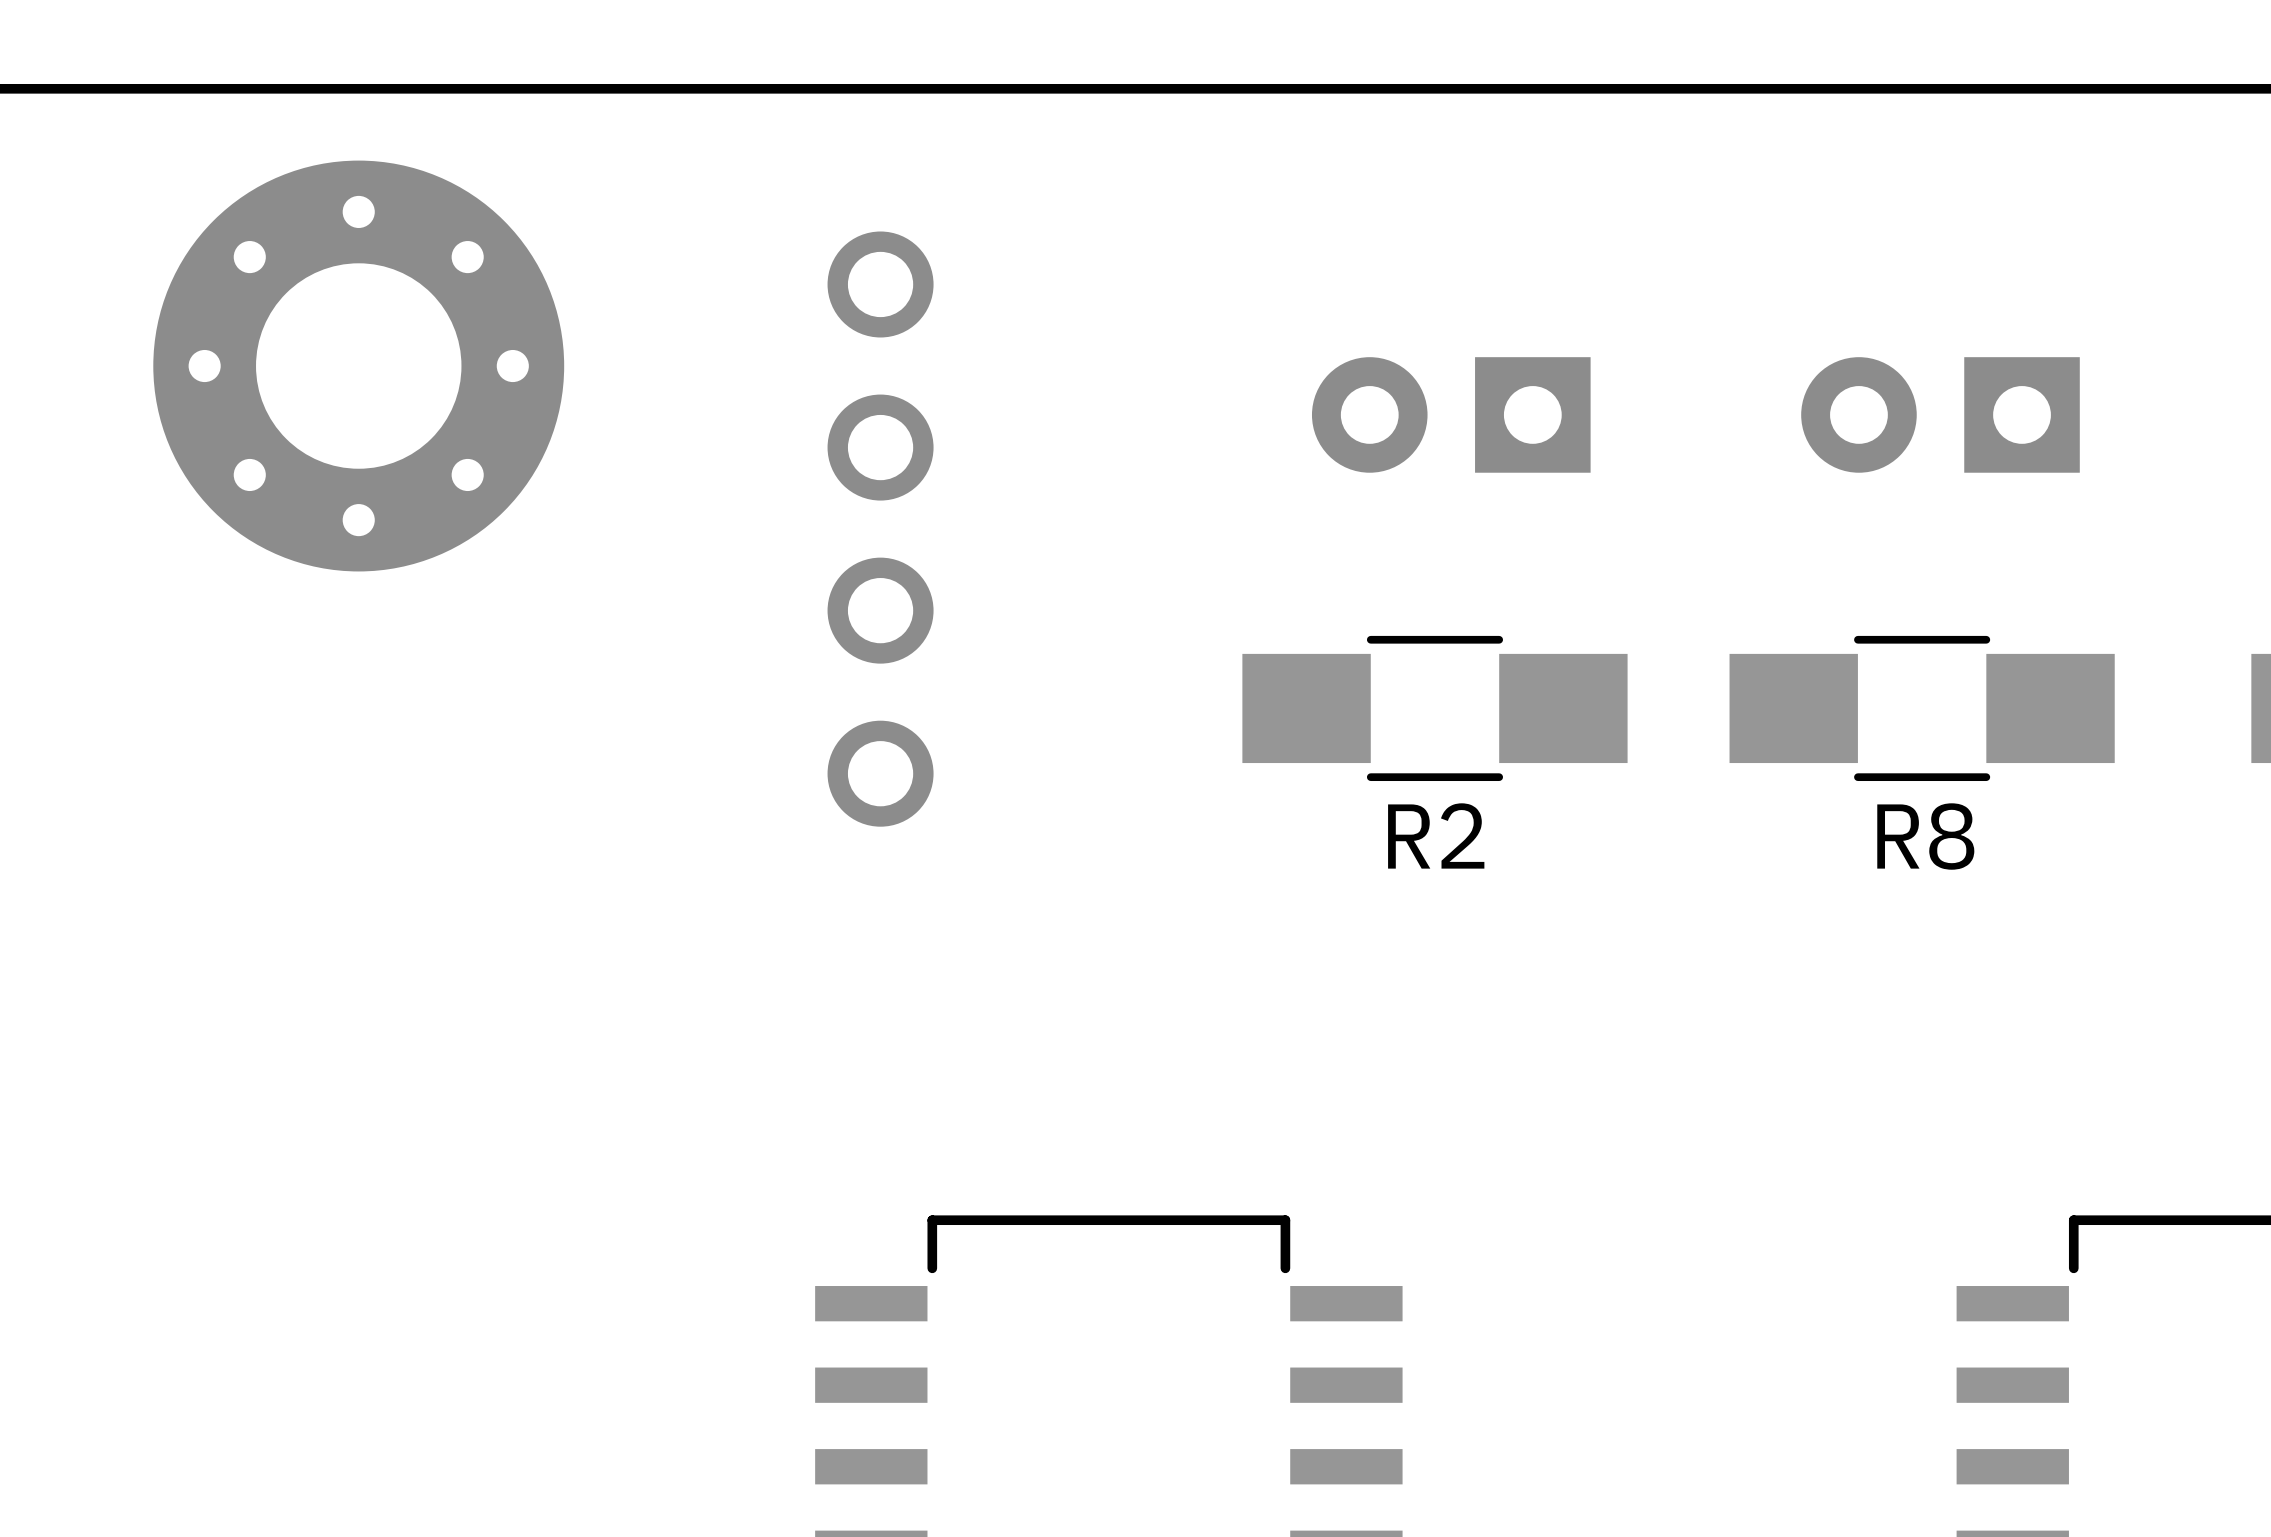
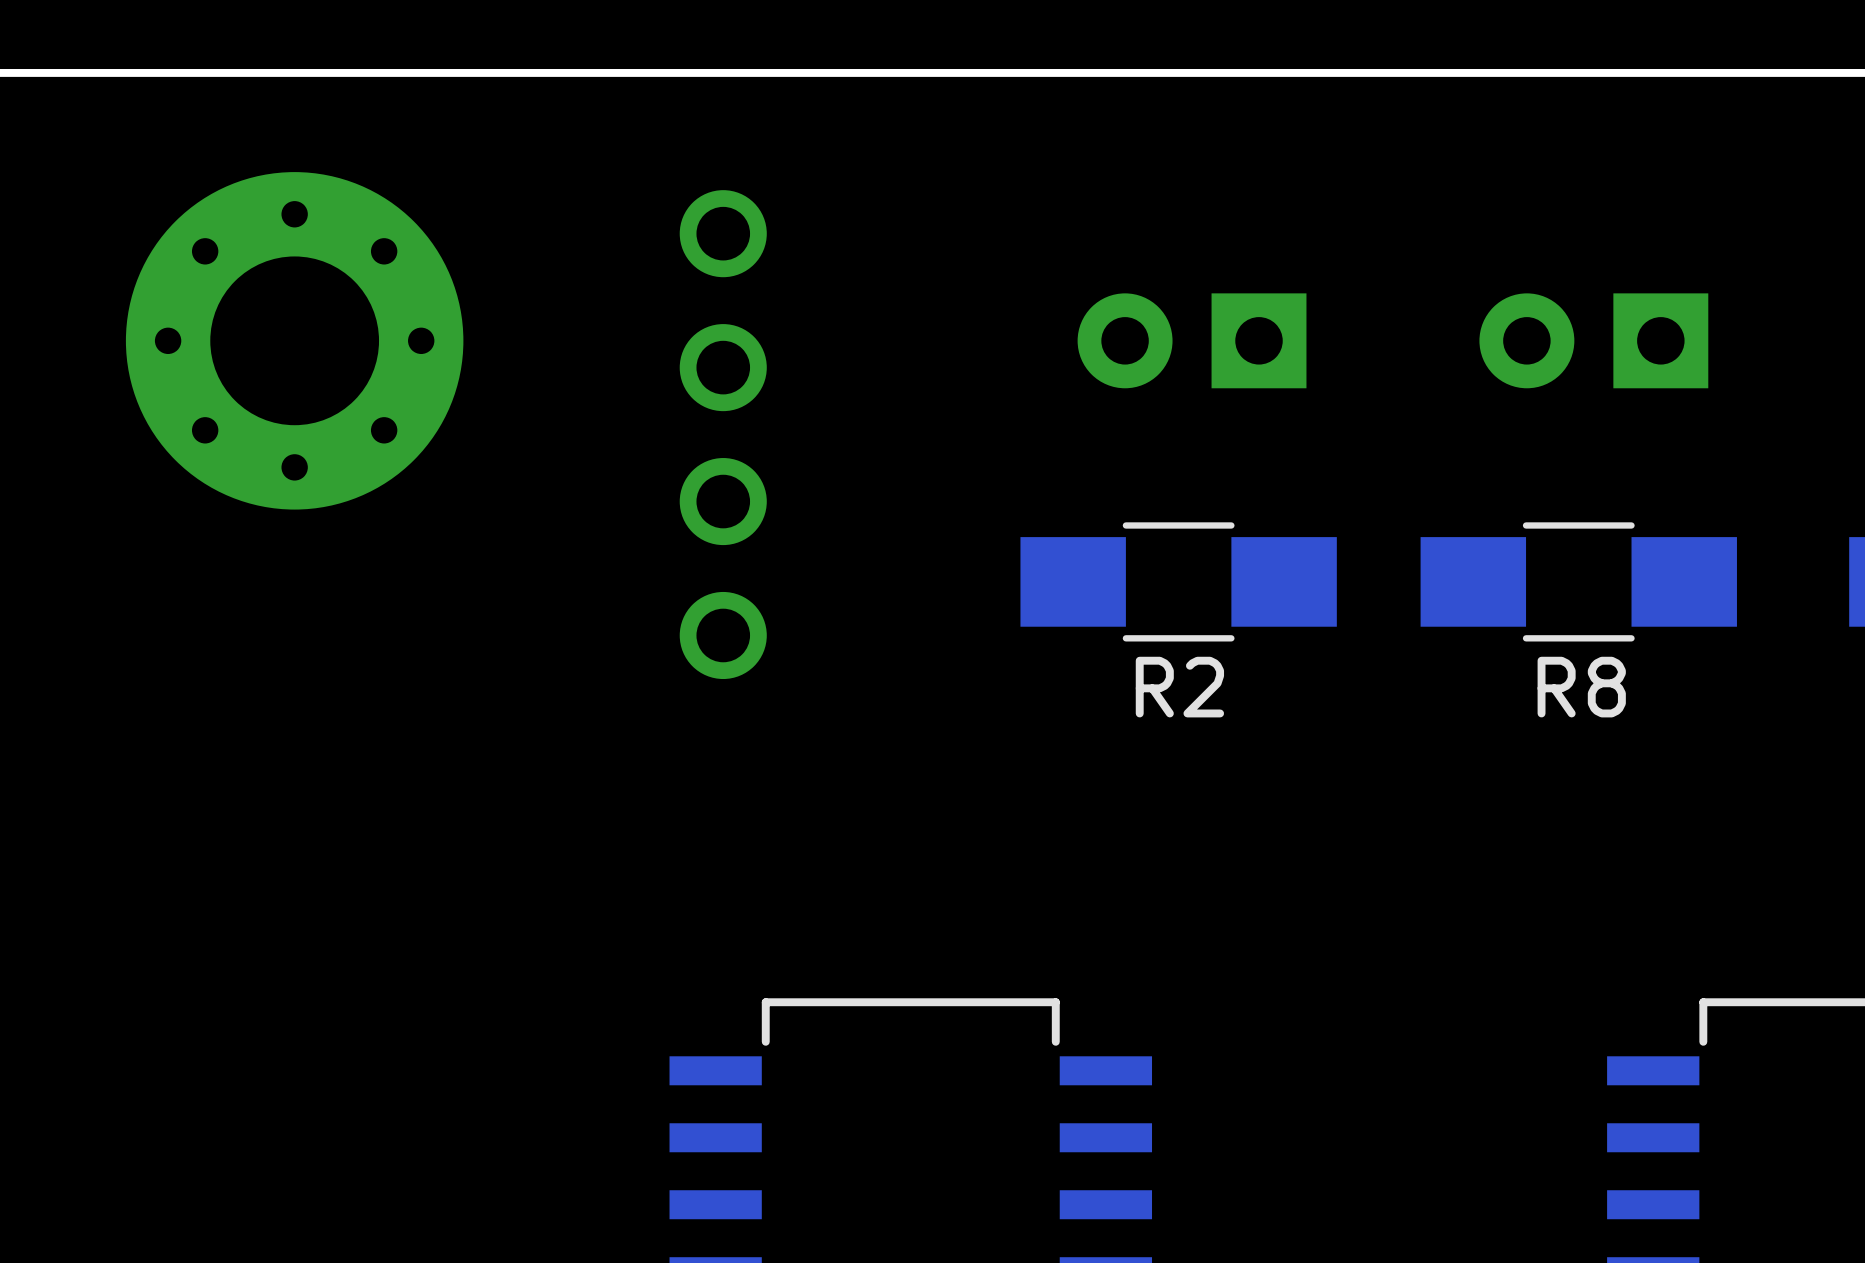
part position: (358, 366) -> (294, 340)

